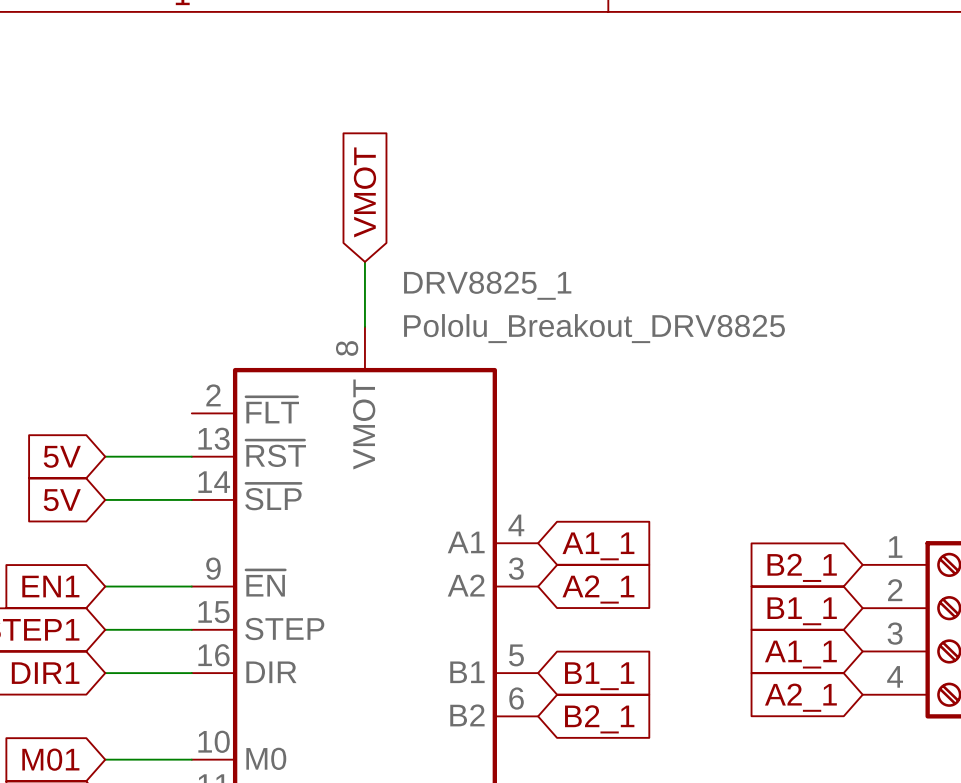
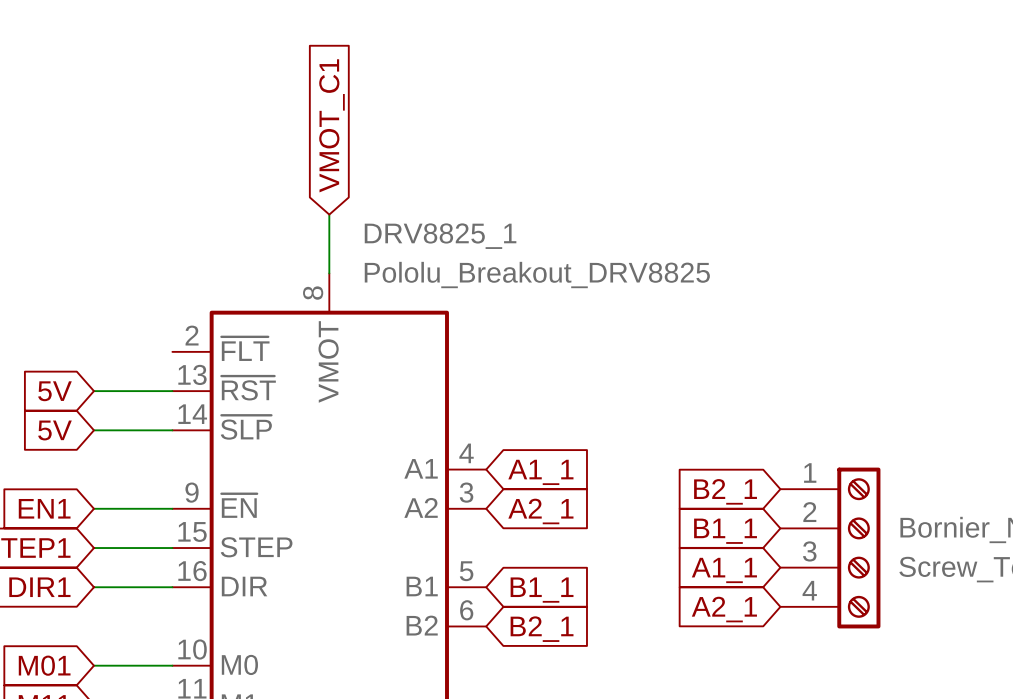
global label: VMOT (364, 192) -> VMOT_C1 (332, 125)

